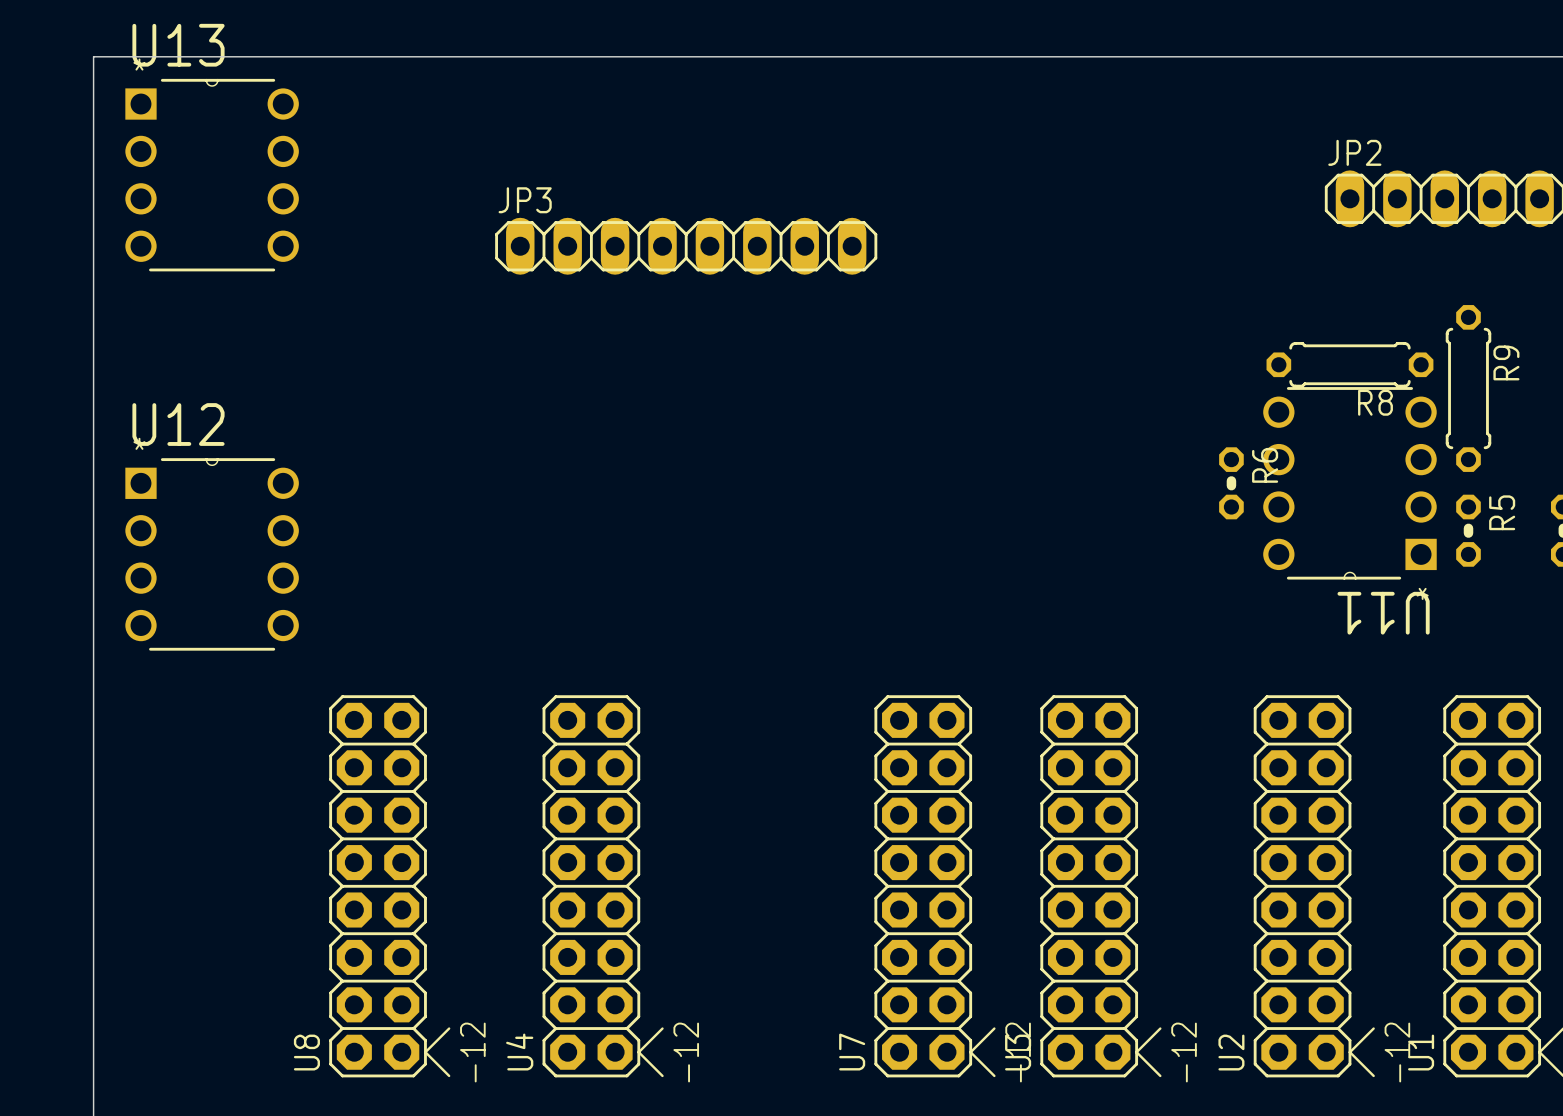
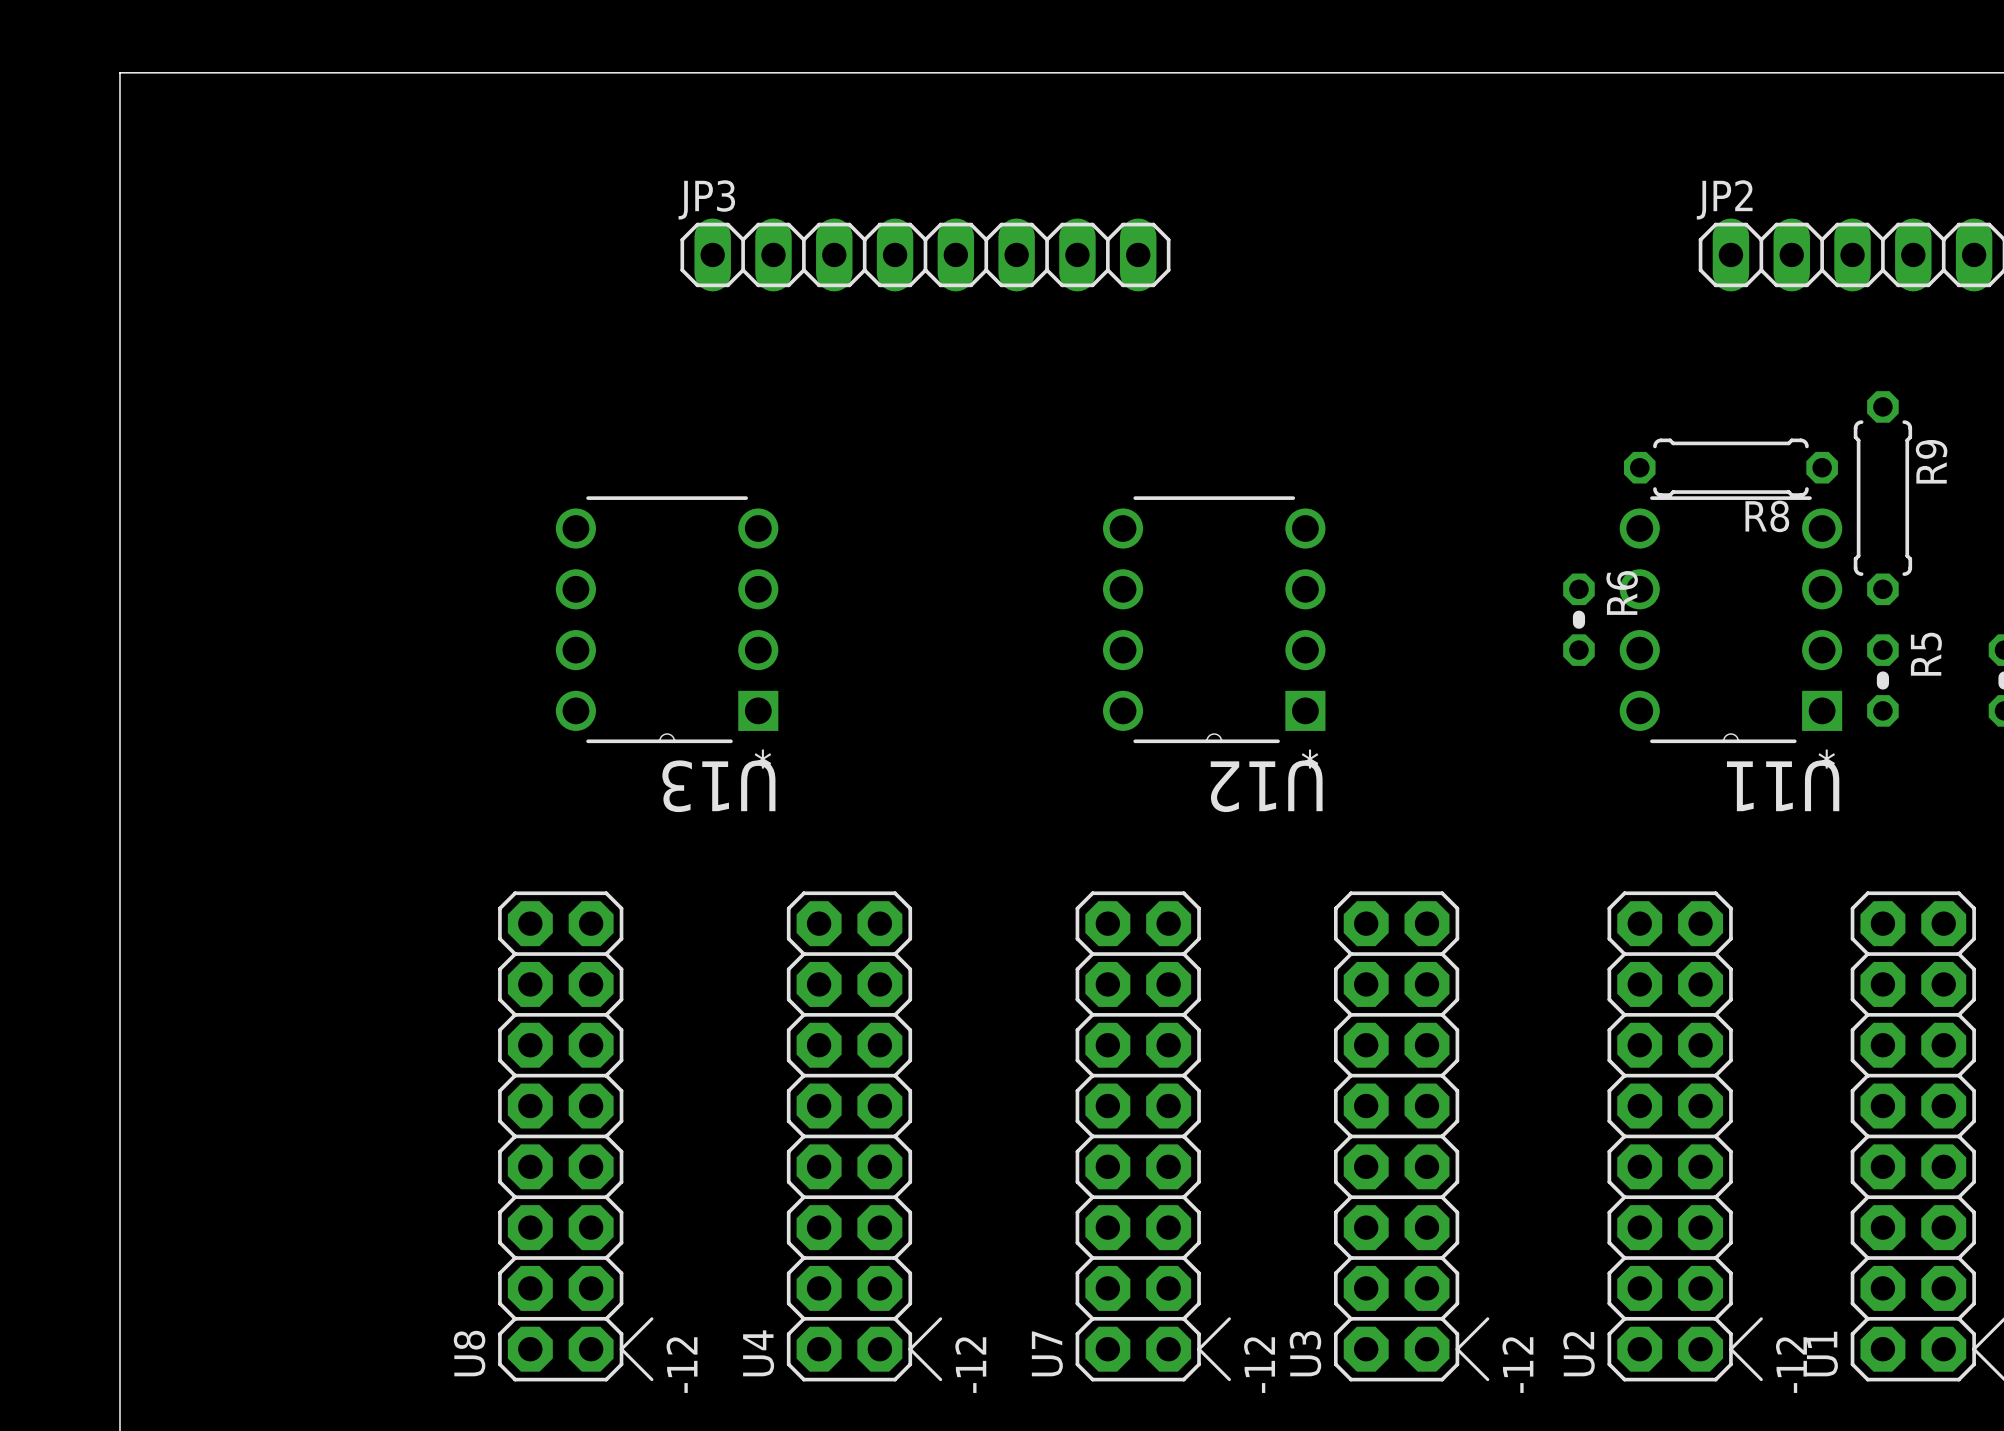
U13 rotation: 0° (212, 175) -> 180° (667, 619)
U13 position: (212, 175) -> (667, 619)
JP3 position: (686, 246) -> (925, 254)
U12 rotation: 0° (212, 554) -> 180° (1214, 619)
U12 position: (212, 554) -> (1214, 619)
U8 position: (389, 886) -> (575, 1136)
U4 position: (603, 886) -> (864, 1136)
U7 position: (935, 886) -> (1153, 1136)

